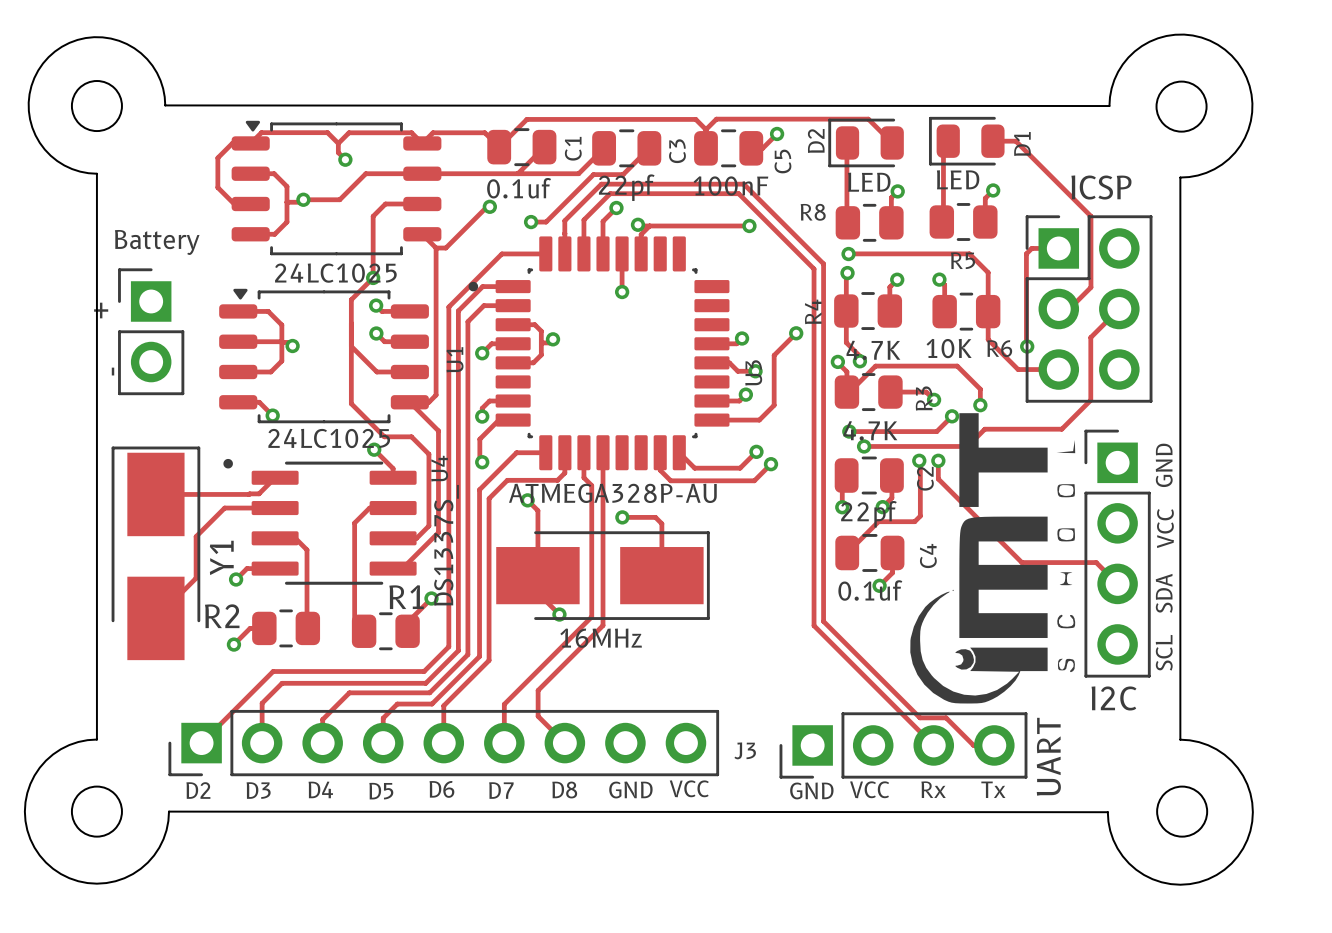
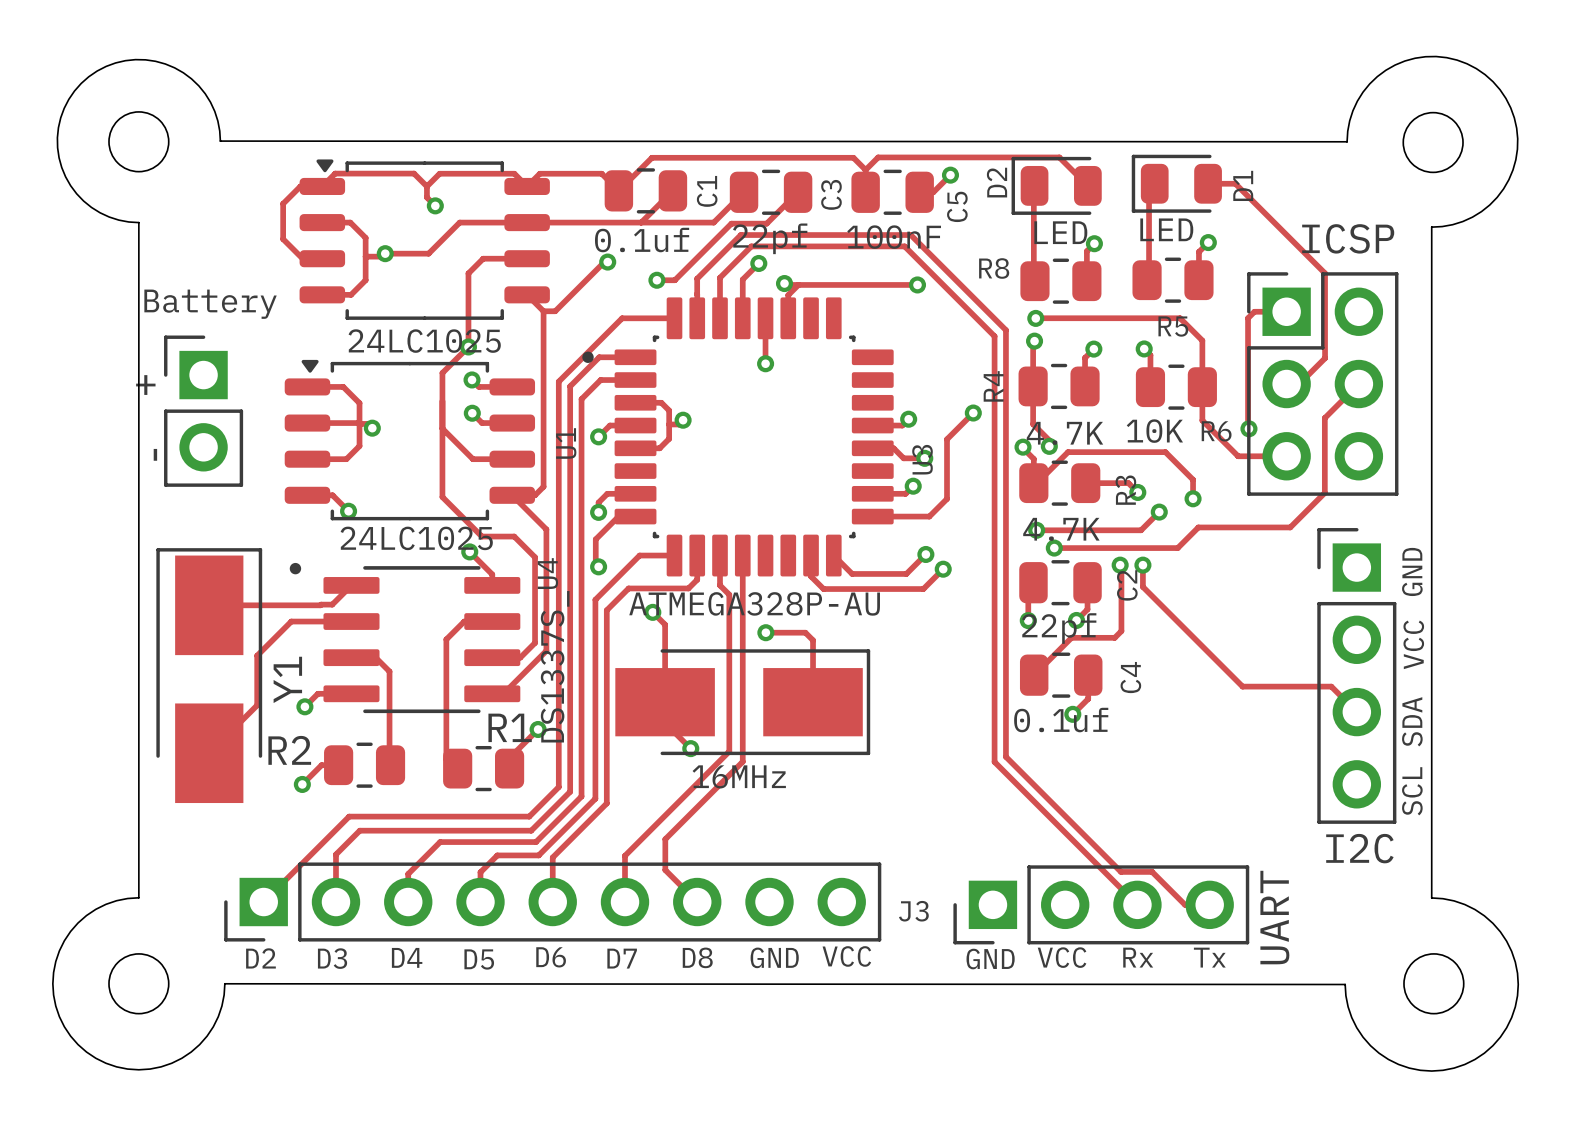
drawing: [910, 413, 1076, 704] -> none

